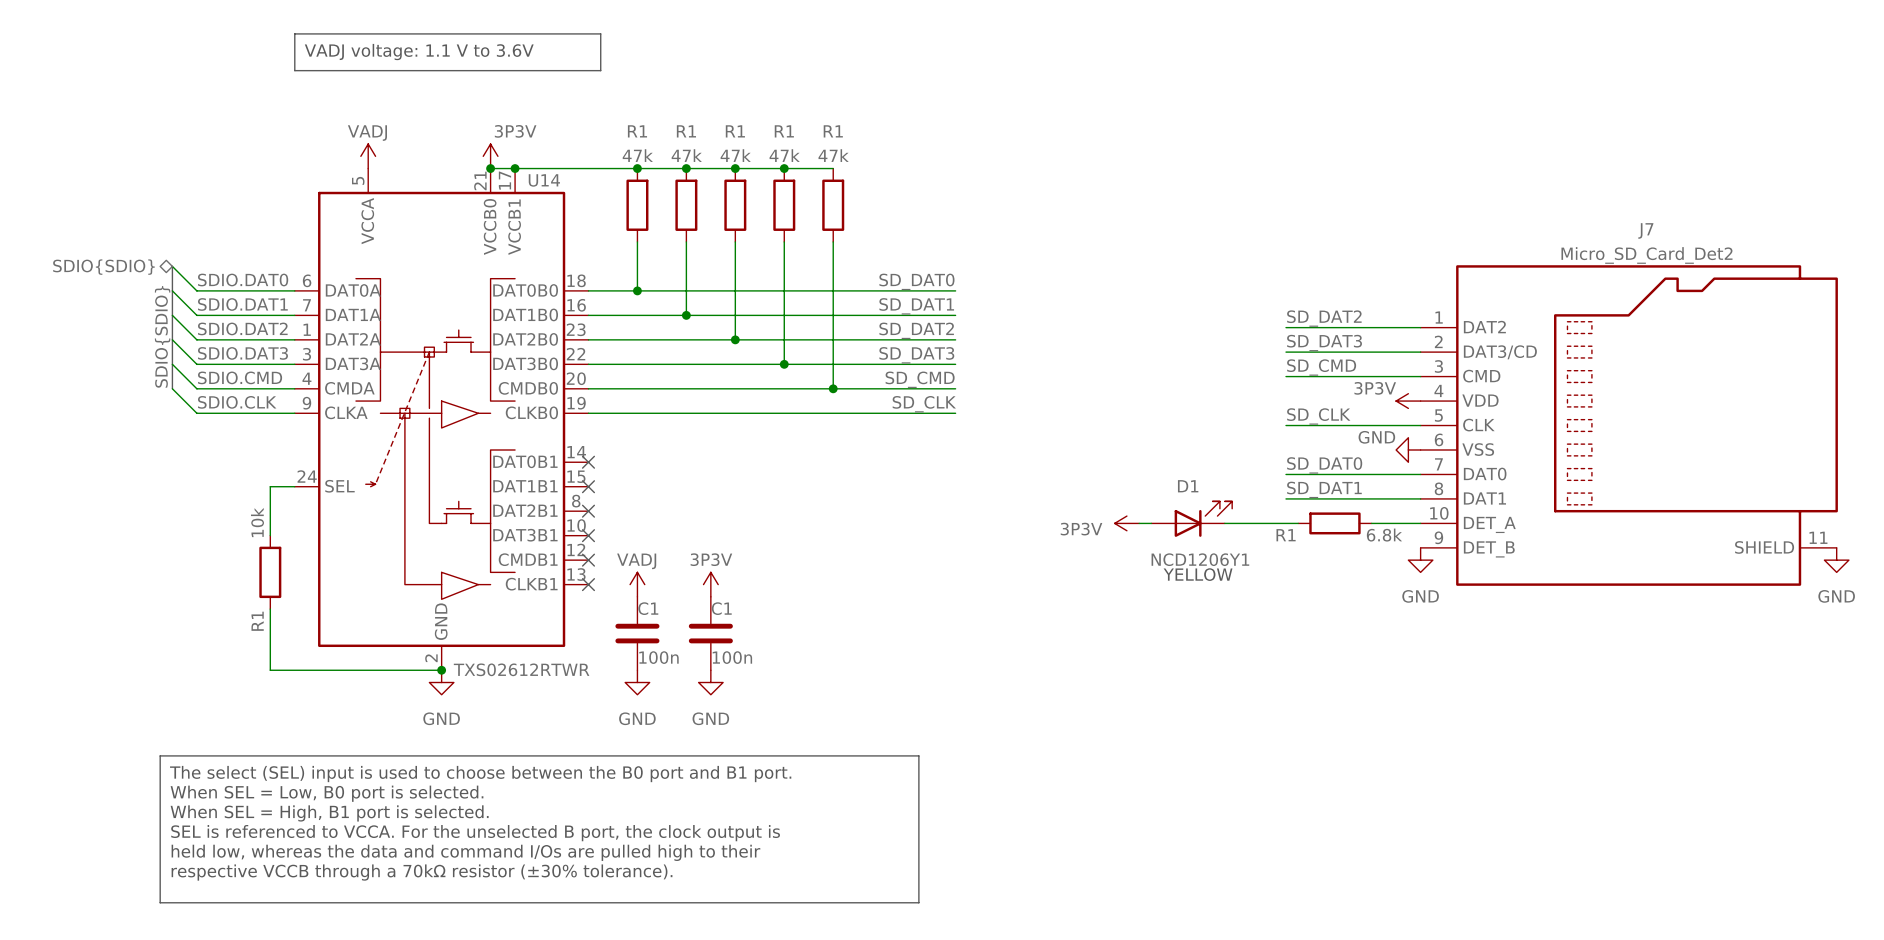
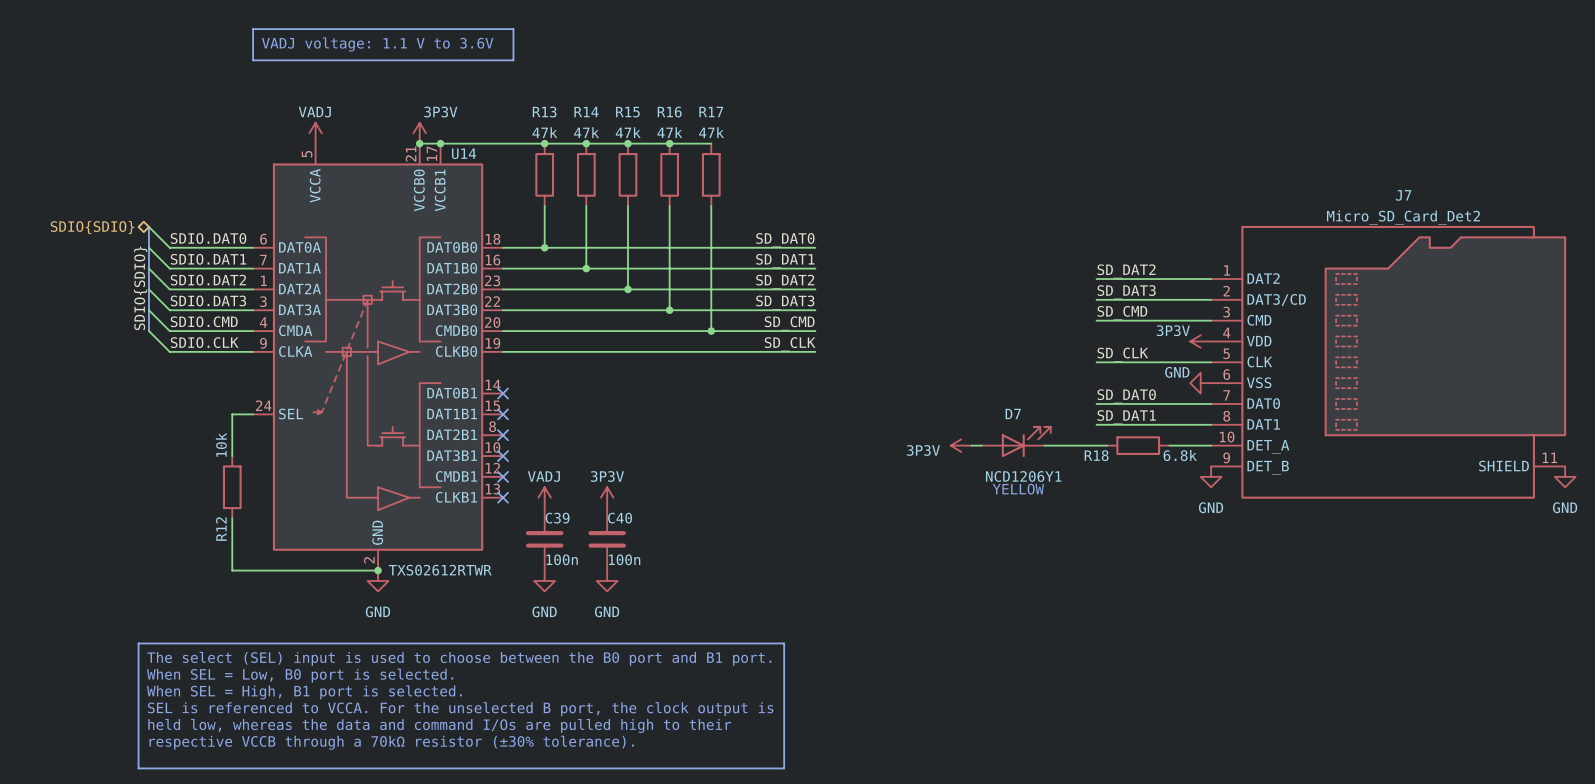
R1 name: R1 (637, 131) -> R13 (544, 112)
R1 name: R1 (686, 131) -> R14 (586, 112)
R1 name: R1 (735, 131) -> R15 (627, 112)
R1 name: R1 (784, 131) -> R16 (669, 112)
R1 name: R1 (833, 131) -> R17 (711, 112)
D1 name: D1 (1188, 486) -> D7 (1013, 413)
R1 name: R1 (1286, 535) -> R18 (1096, 455)
C1 name: C1 (648, 608) -> C39 (557, 518)
C1 name: C1 (721, 608) -> C40 (620, 518)
R1 name: R1 (257, 621) -> R12 (221, 529)

